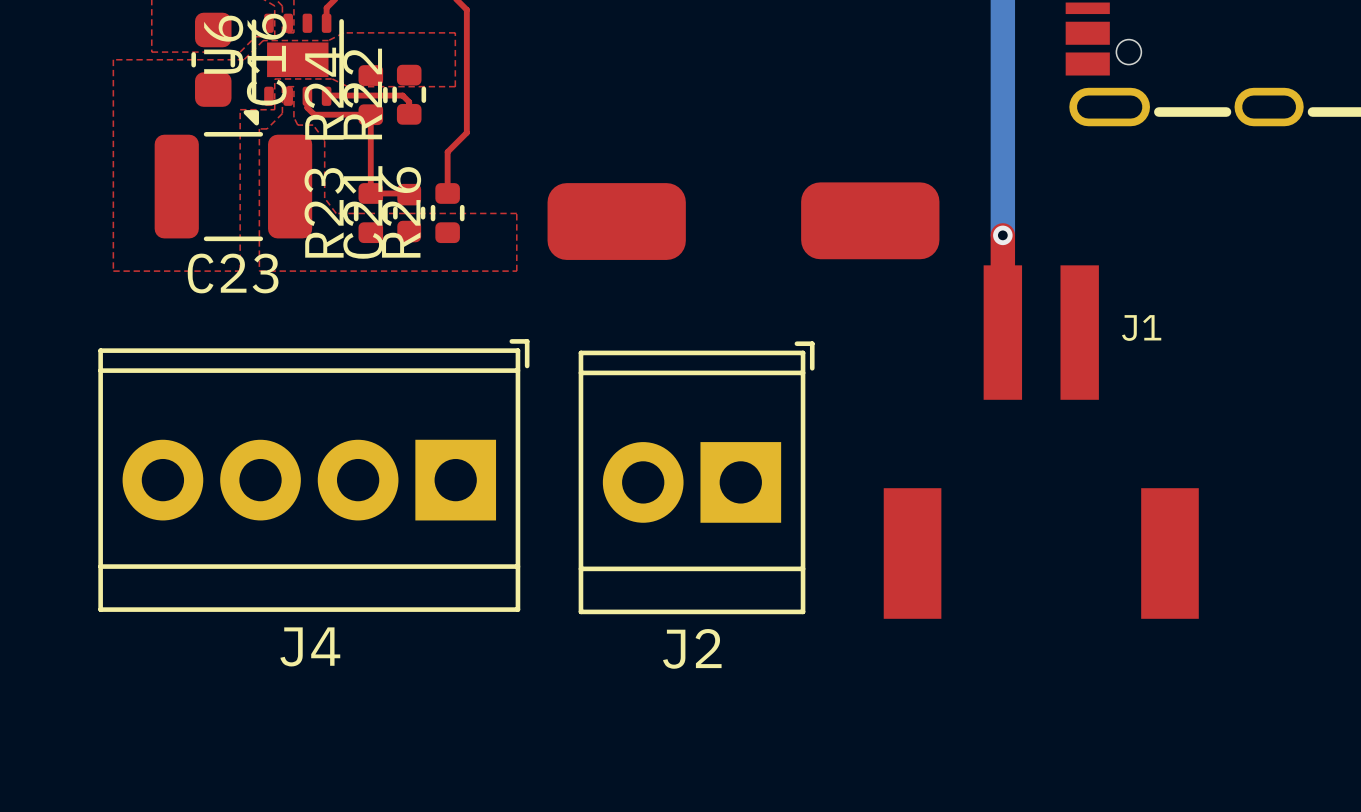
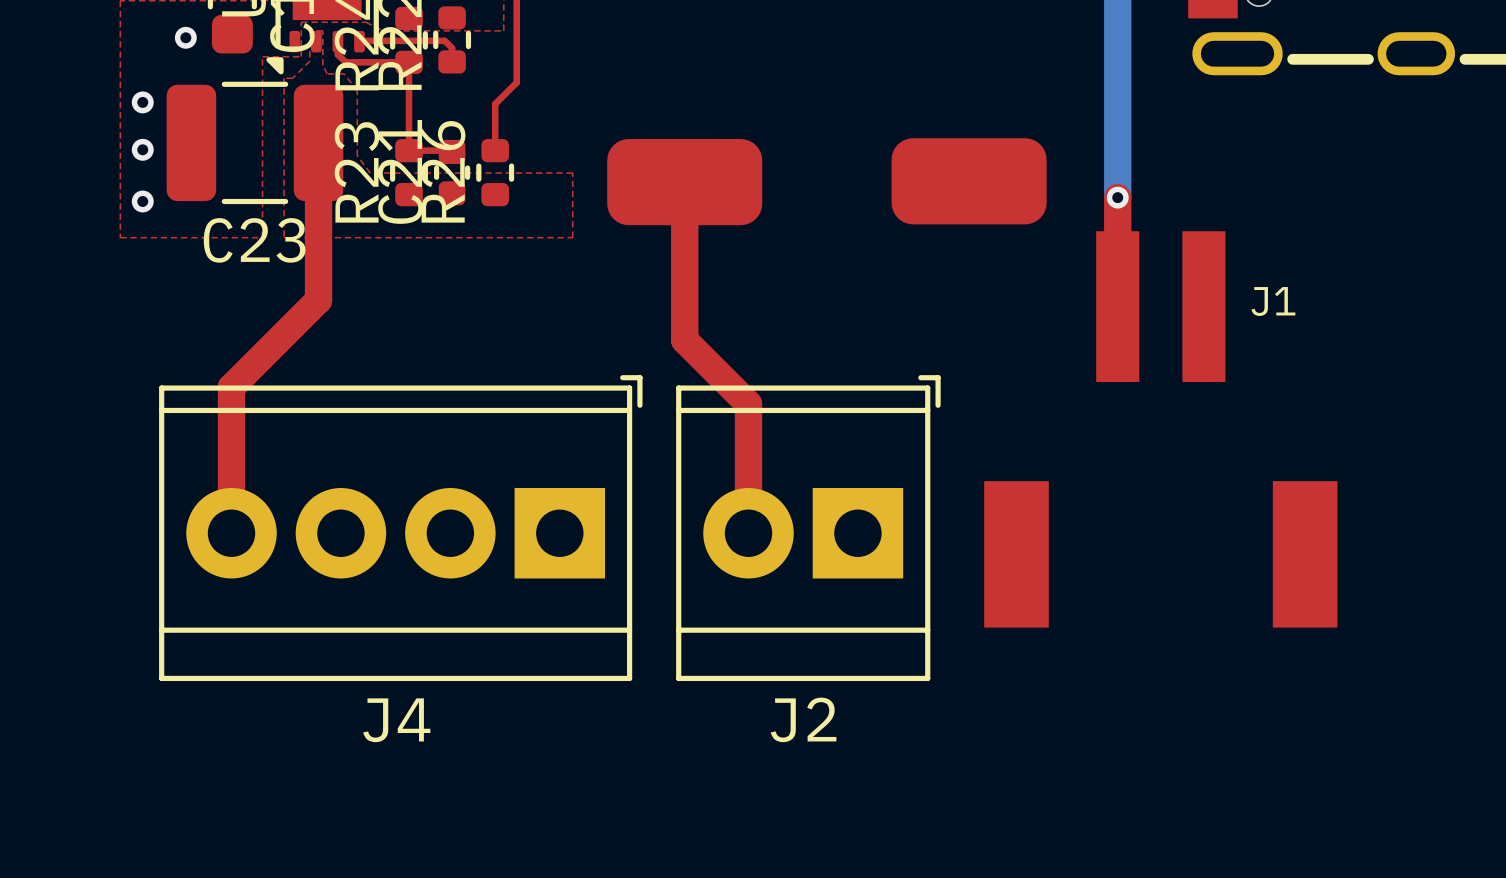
via: none -> (185, 37)
via: none -> (142, 102)
top track: none -> (318, 142) (318, 300) (231, 387) (231, 533)
via: none -> (142, 149)
top track: none -> (684, 182) (684, 340) (748, 403) (748, 533)
via: none -> (142, 201)
J4 position: (313, 475) -> (400, 528)
J2 position: (696, 477) -> (808, 528)

